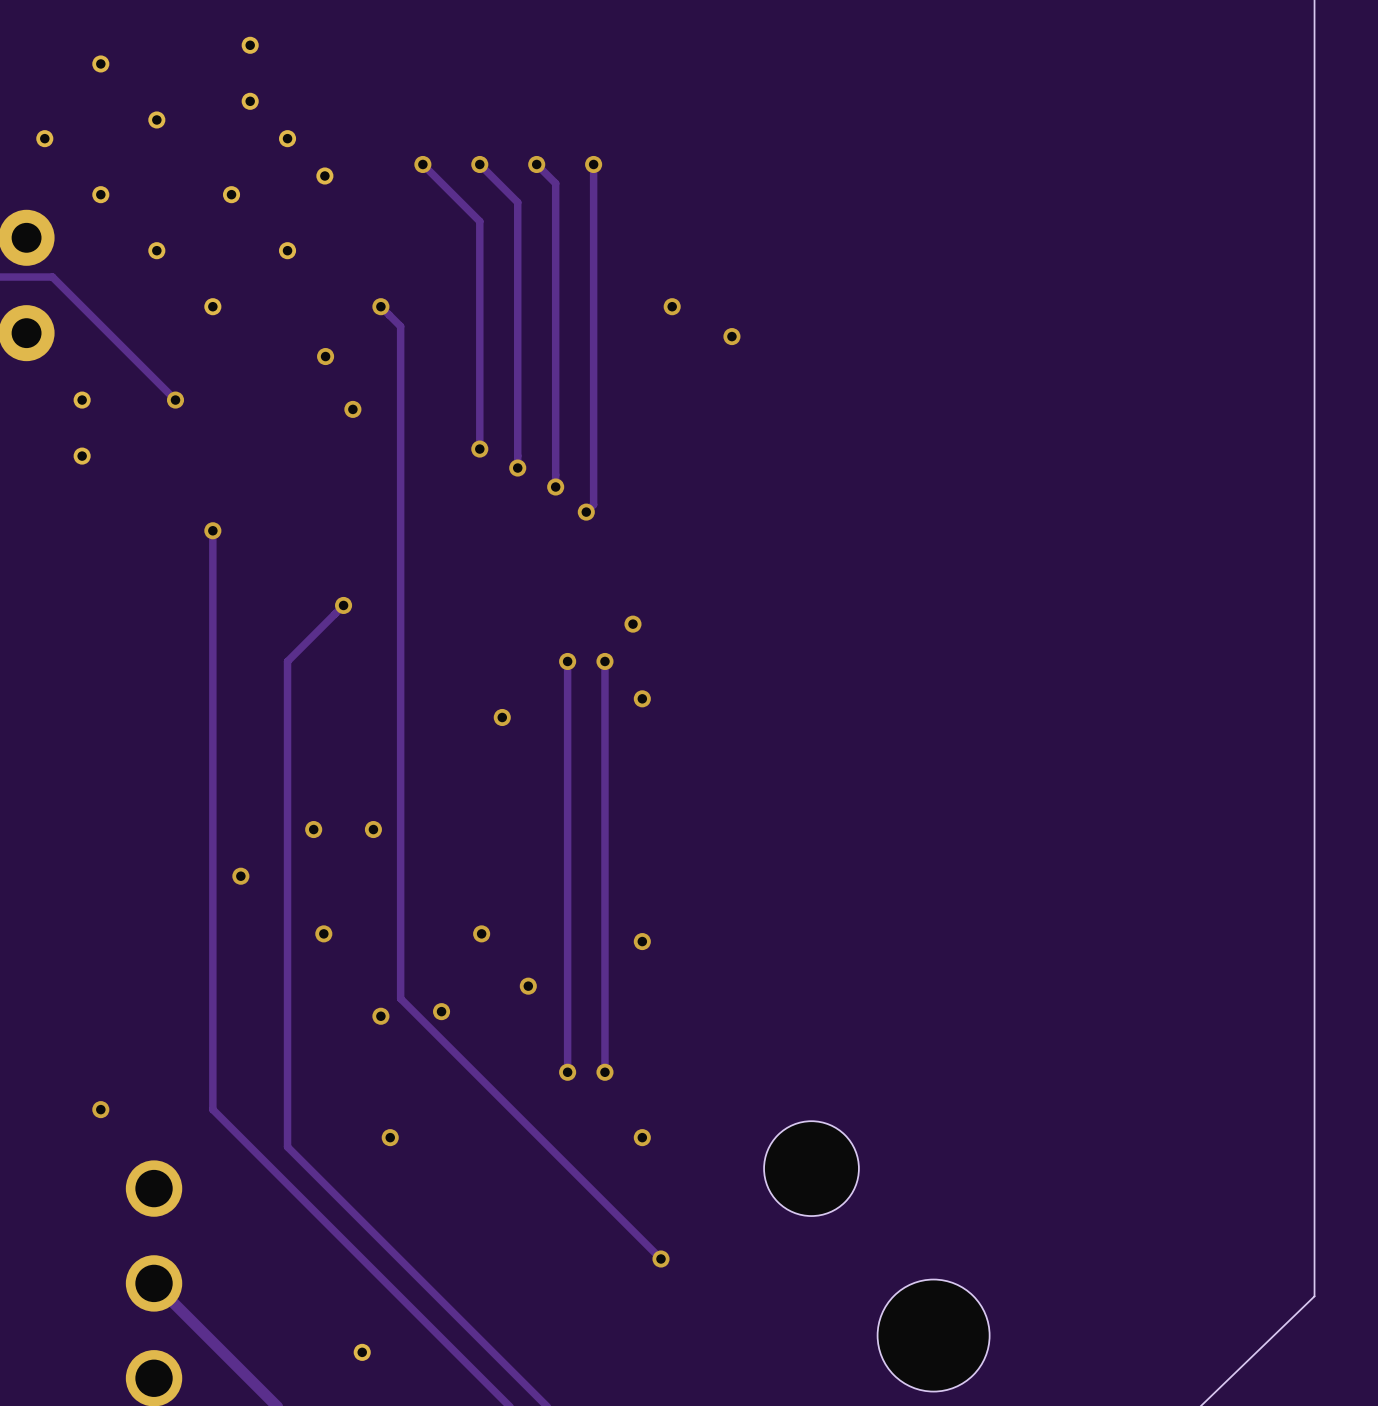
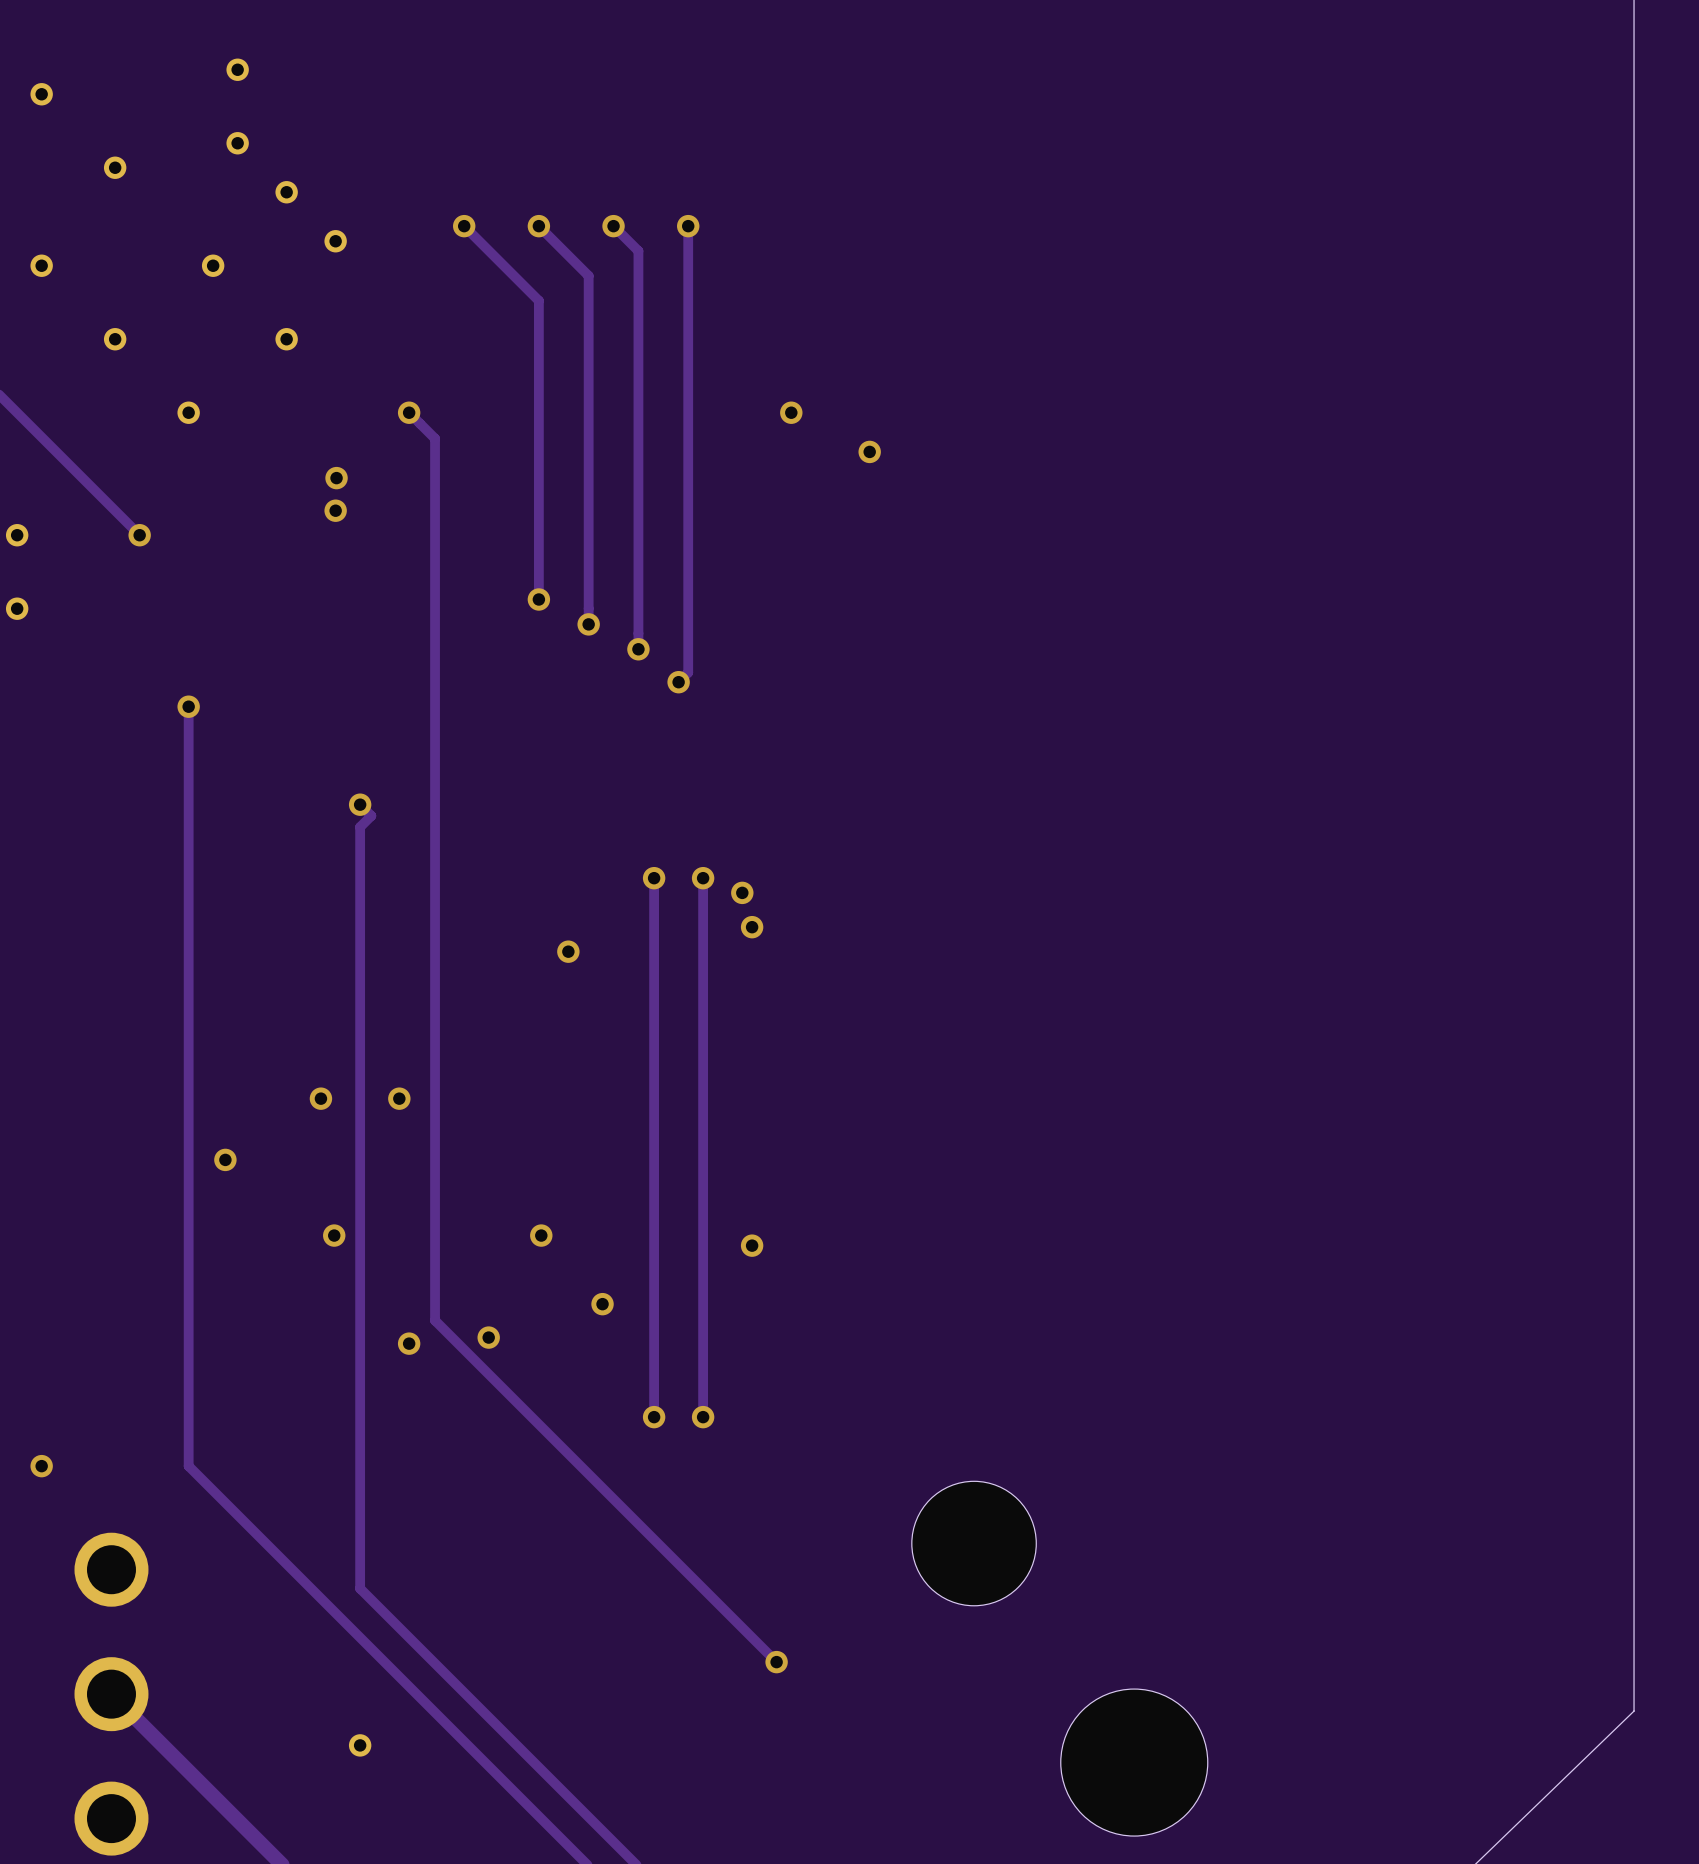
via position: (352, 409) -> (335, 510)
track: (343, 605) (287, 661) (287, 1146) (343, 1202) -> (360, 804) (371, 815) (360, 827) (360, 1588)
via position: (632, 624) -> (742, 892)
via: (390, 1137) -> none
via: (642, 1137) -> none
part position: (362, 1352) -> (360, 1745)

